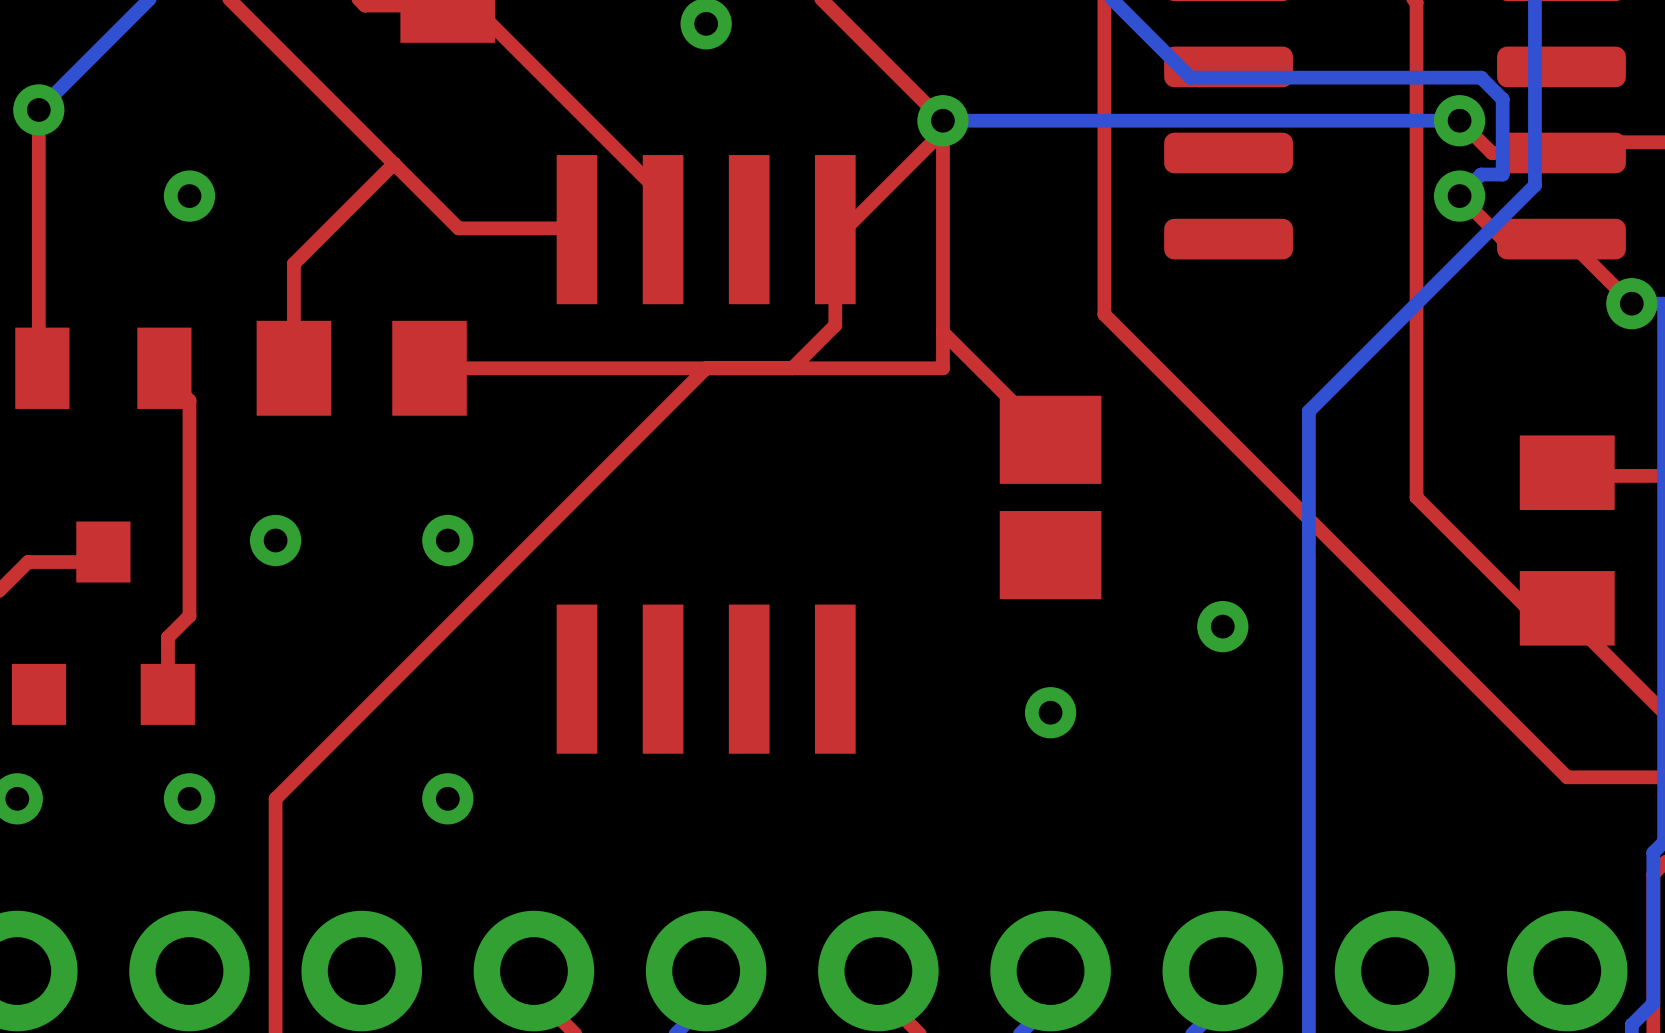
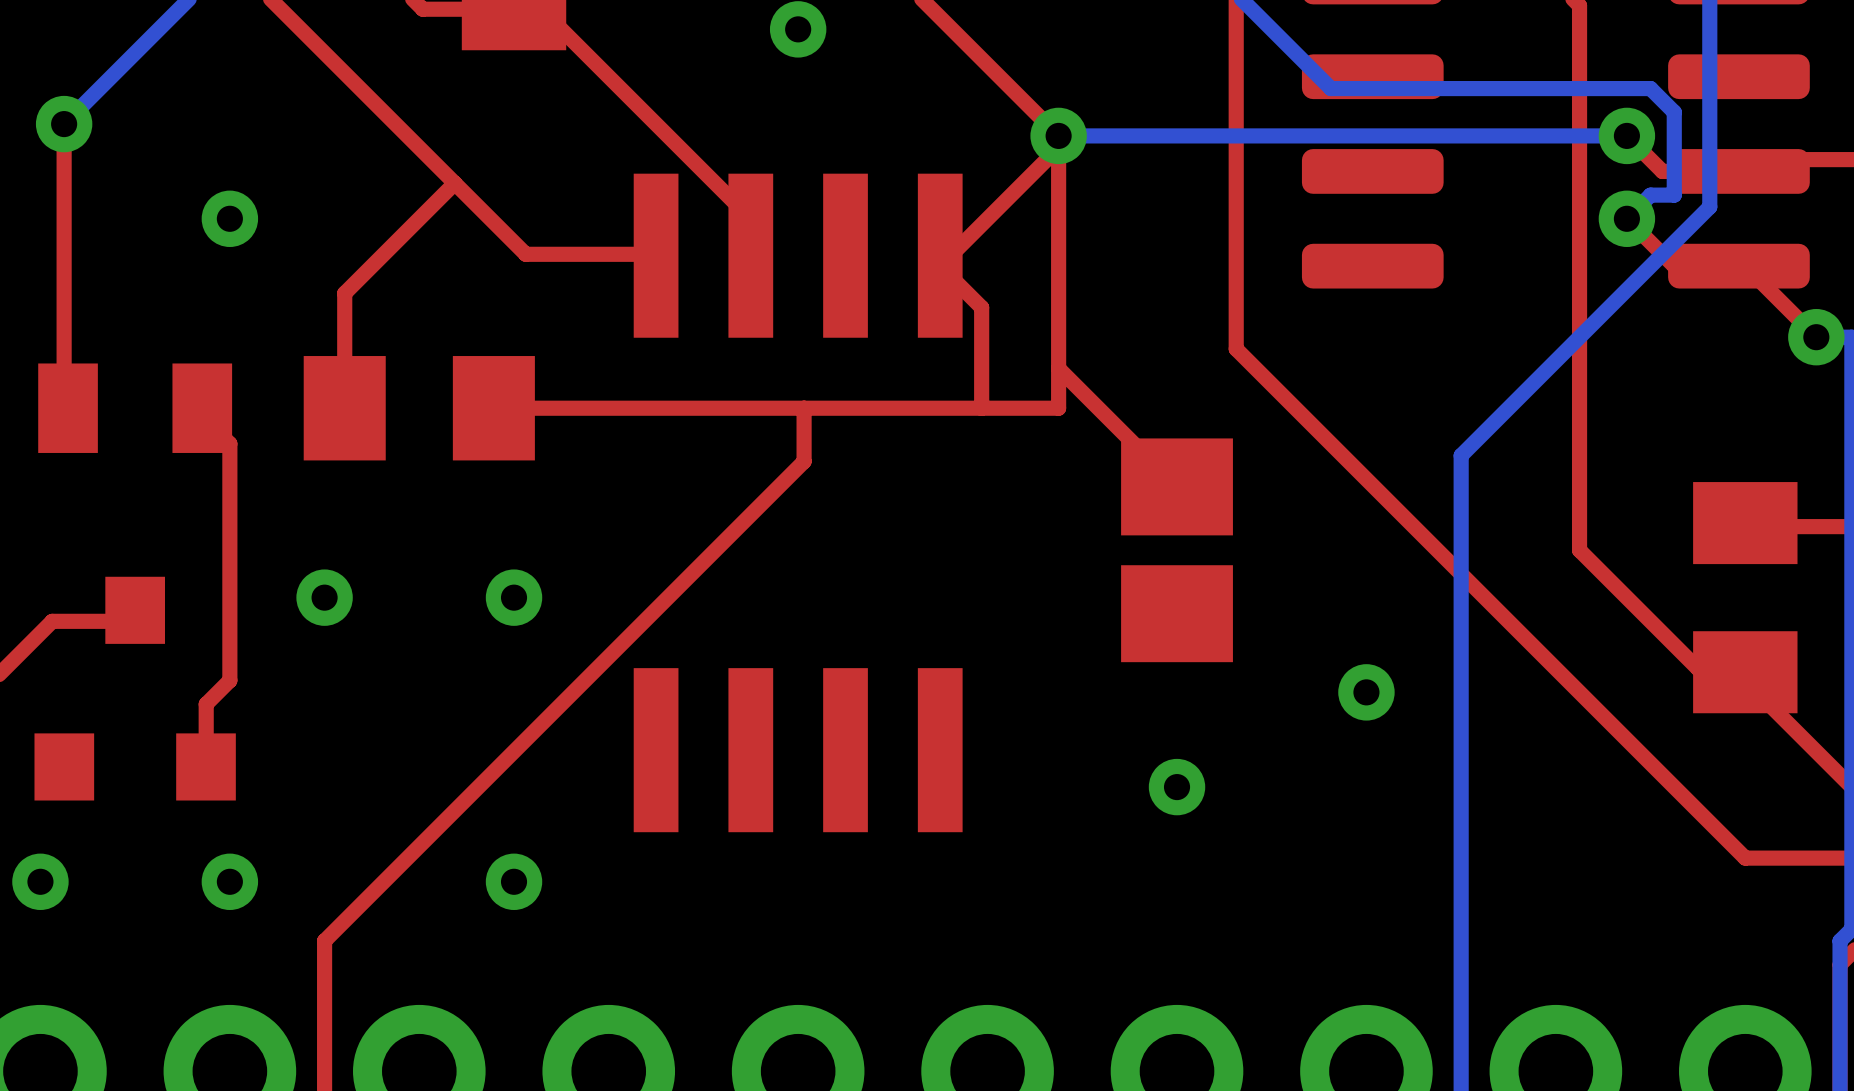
top track: (835, 239) (835, 325) (792, 368) -> (940, 266) (981, 307) (981, 408)
top track: (706, 368) (275, 798) (275, 852) -> (804, 408) (804, 461) (324, 940)

